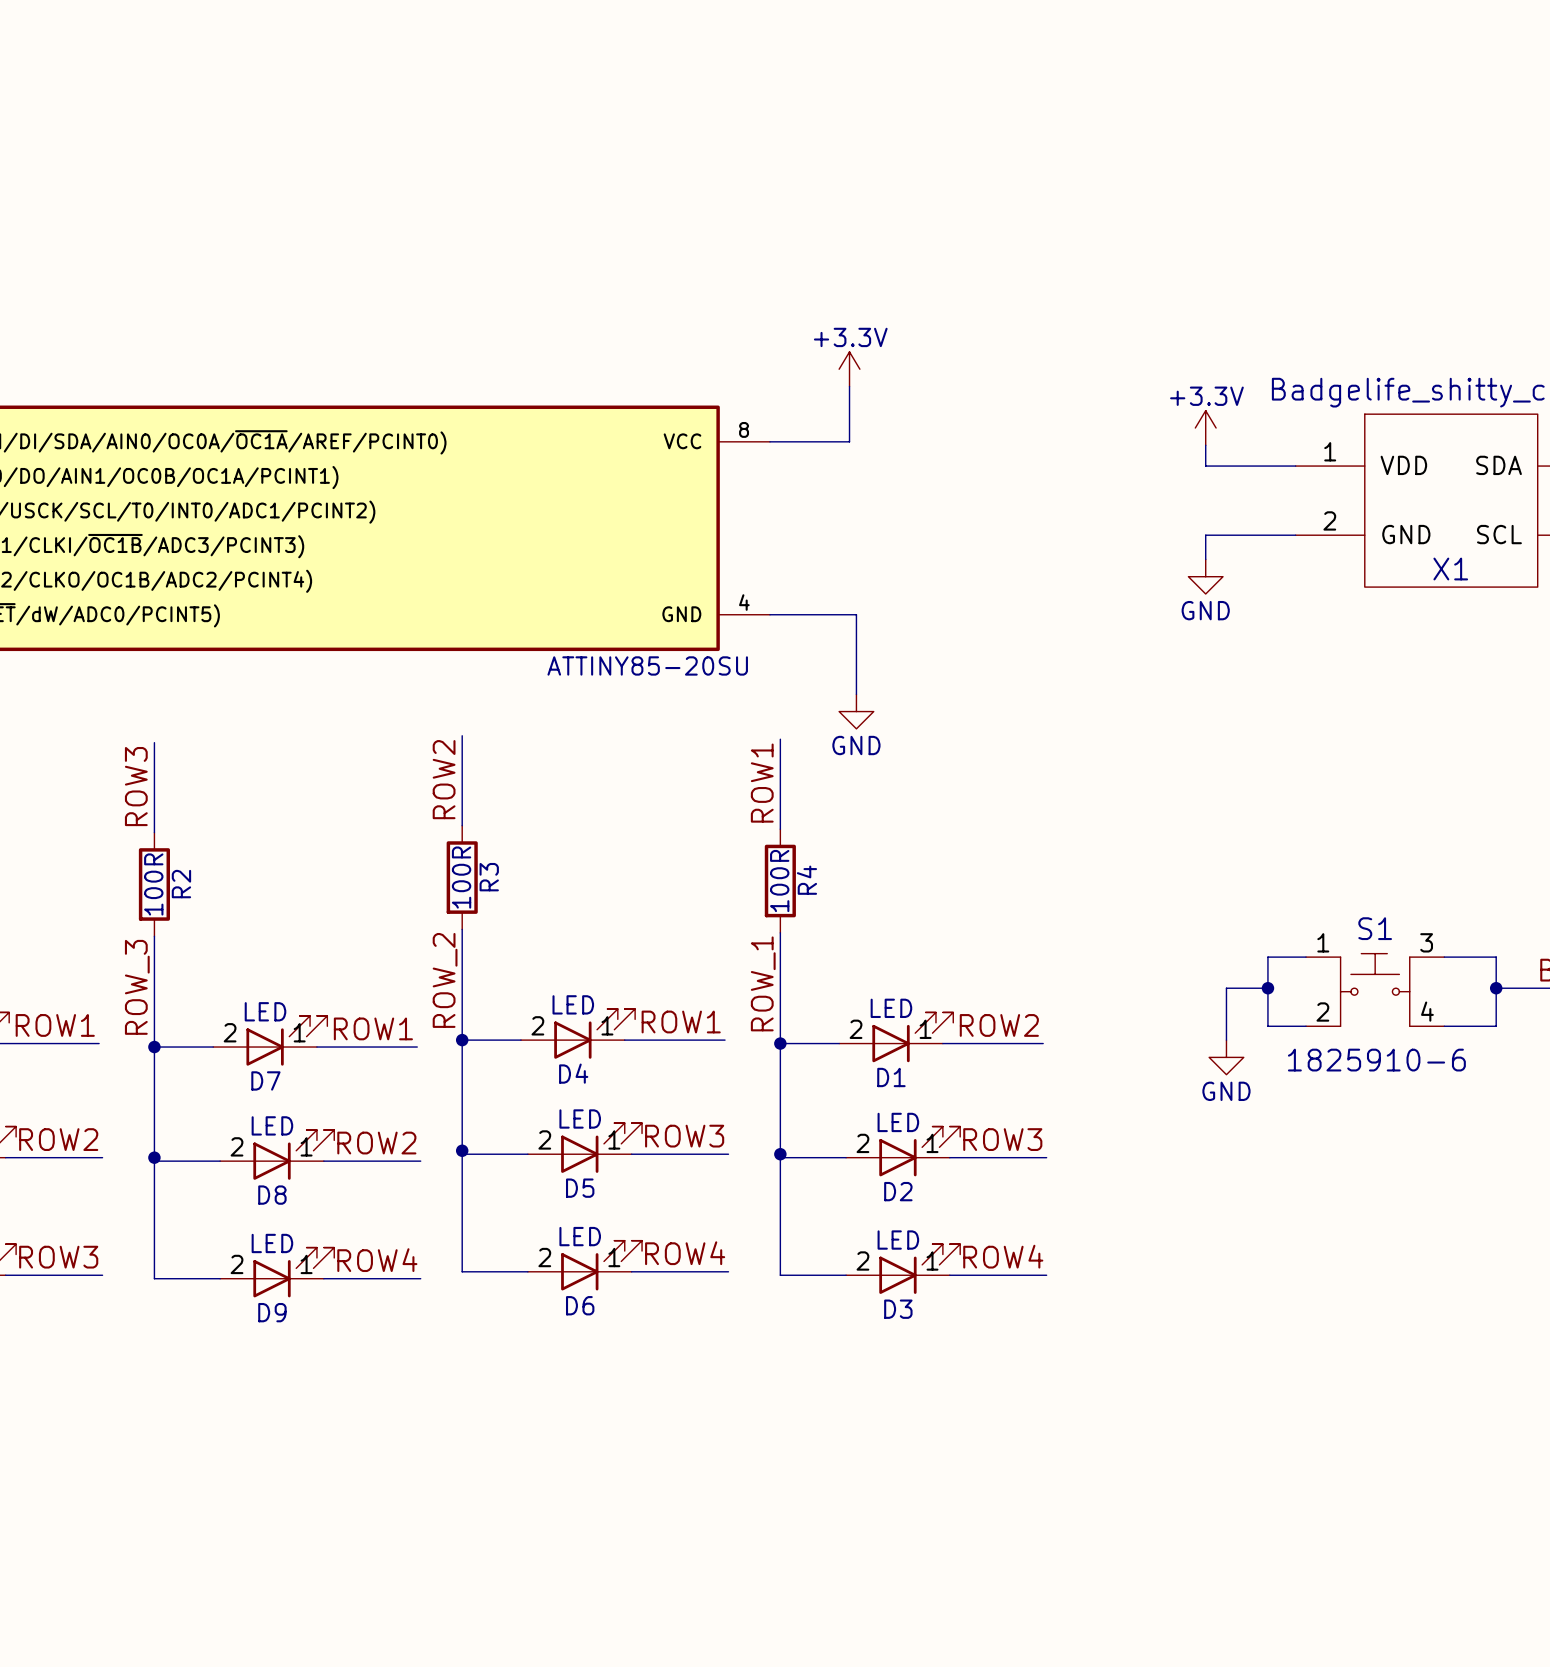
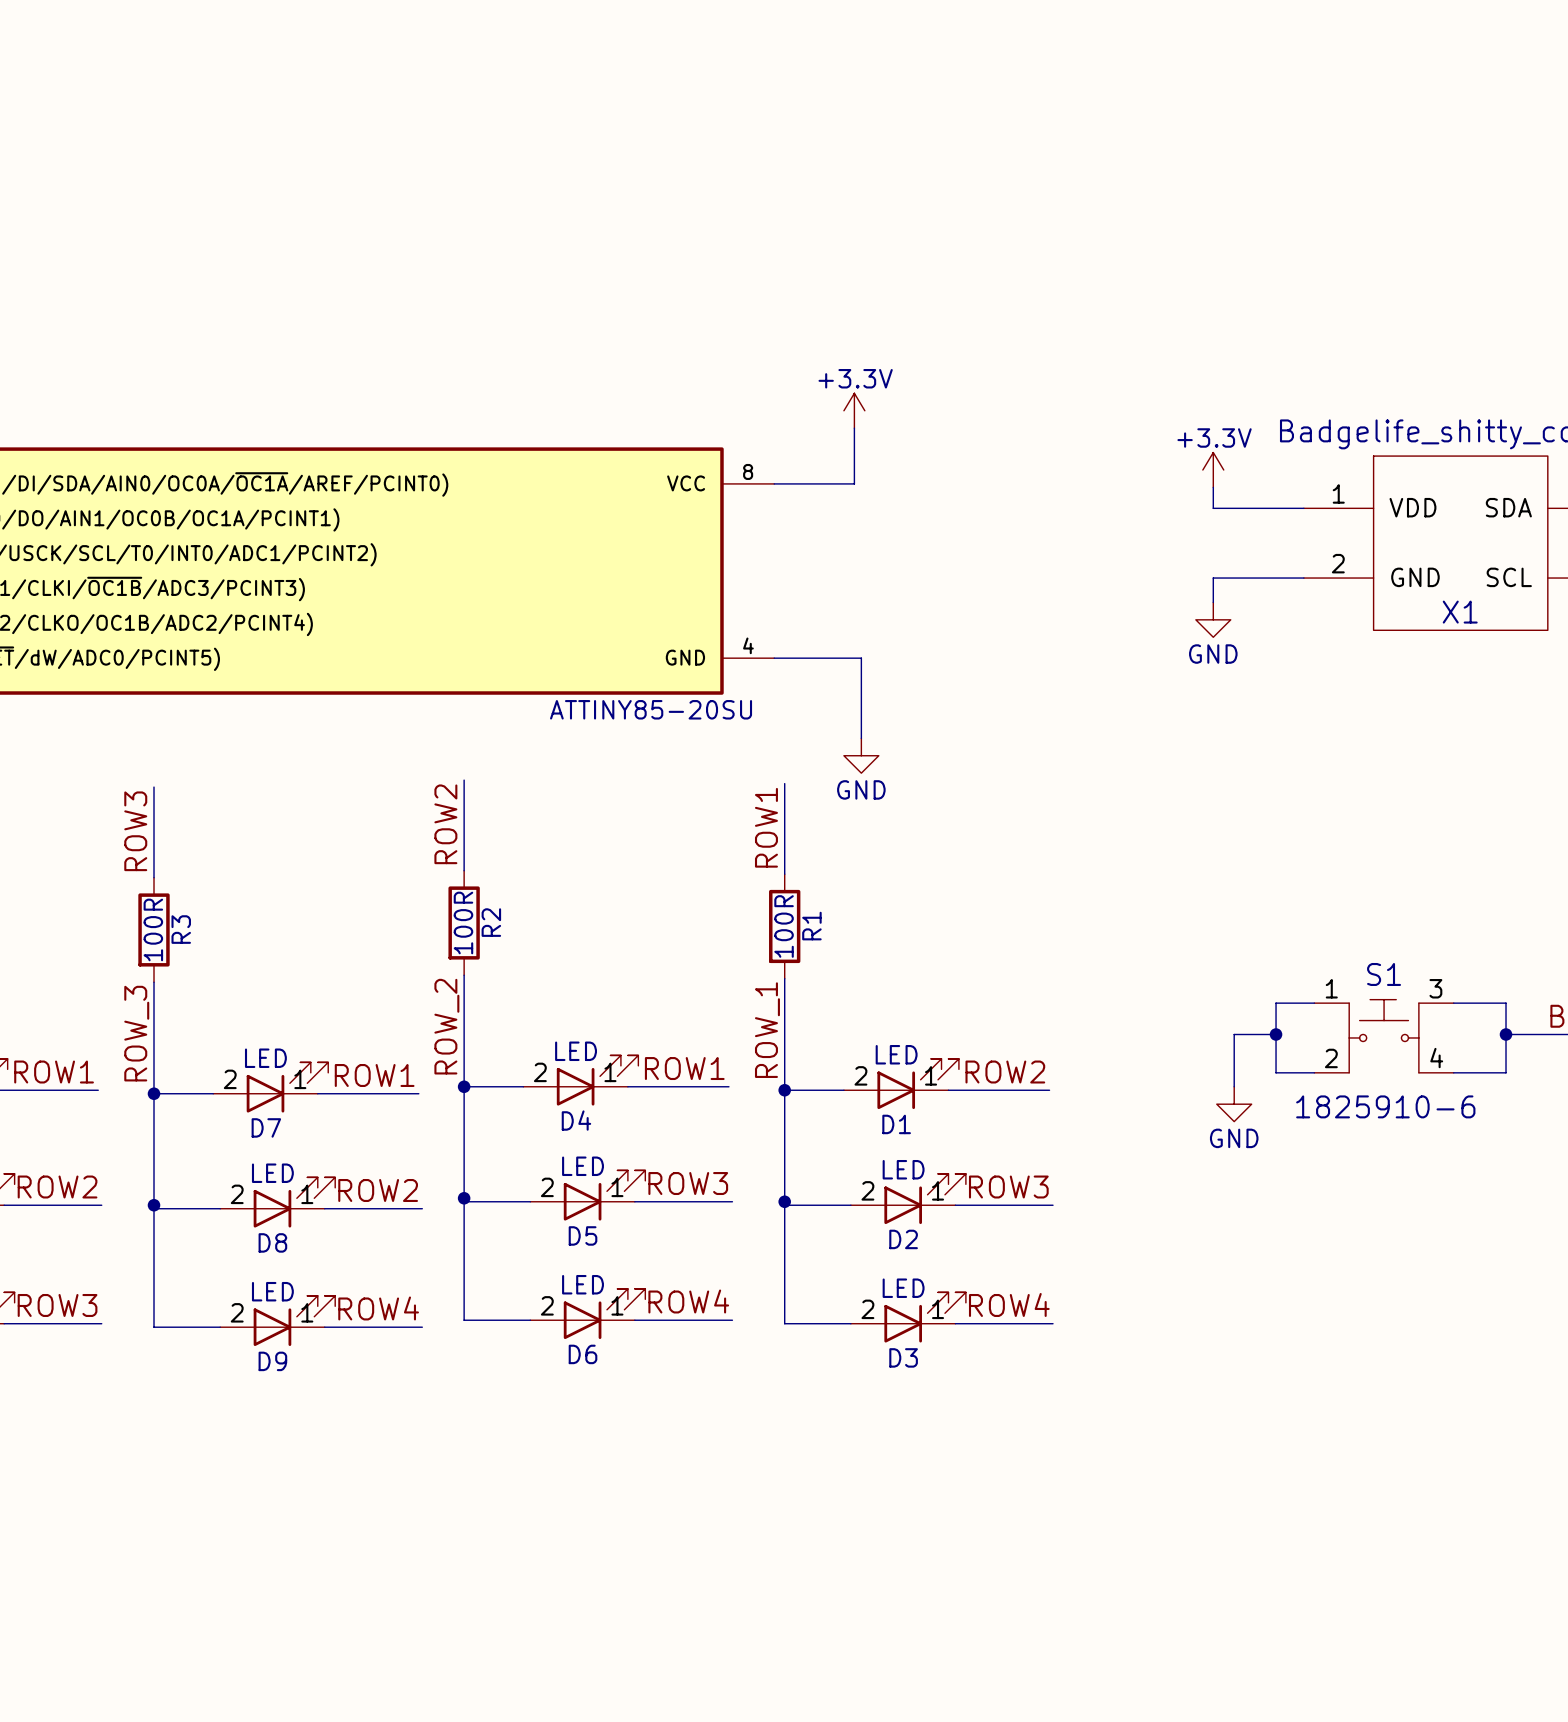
R3 name: R3 (489, 877) -> R2 (491, 922)
R4 name: R4 (806, 880) -> R1 (811, 926)
R2 name: R2 (181, 884) -> R3 (181, 929)

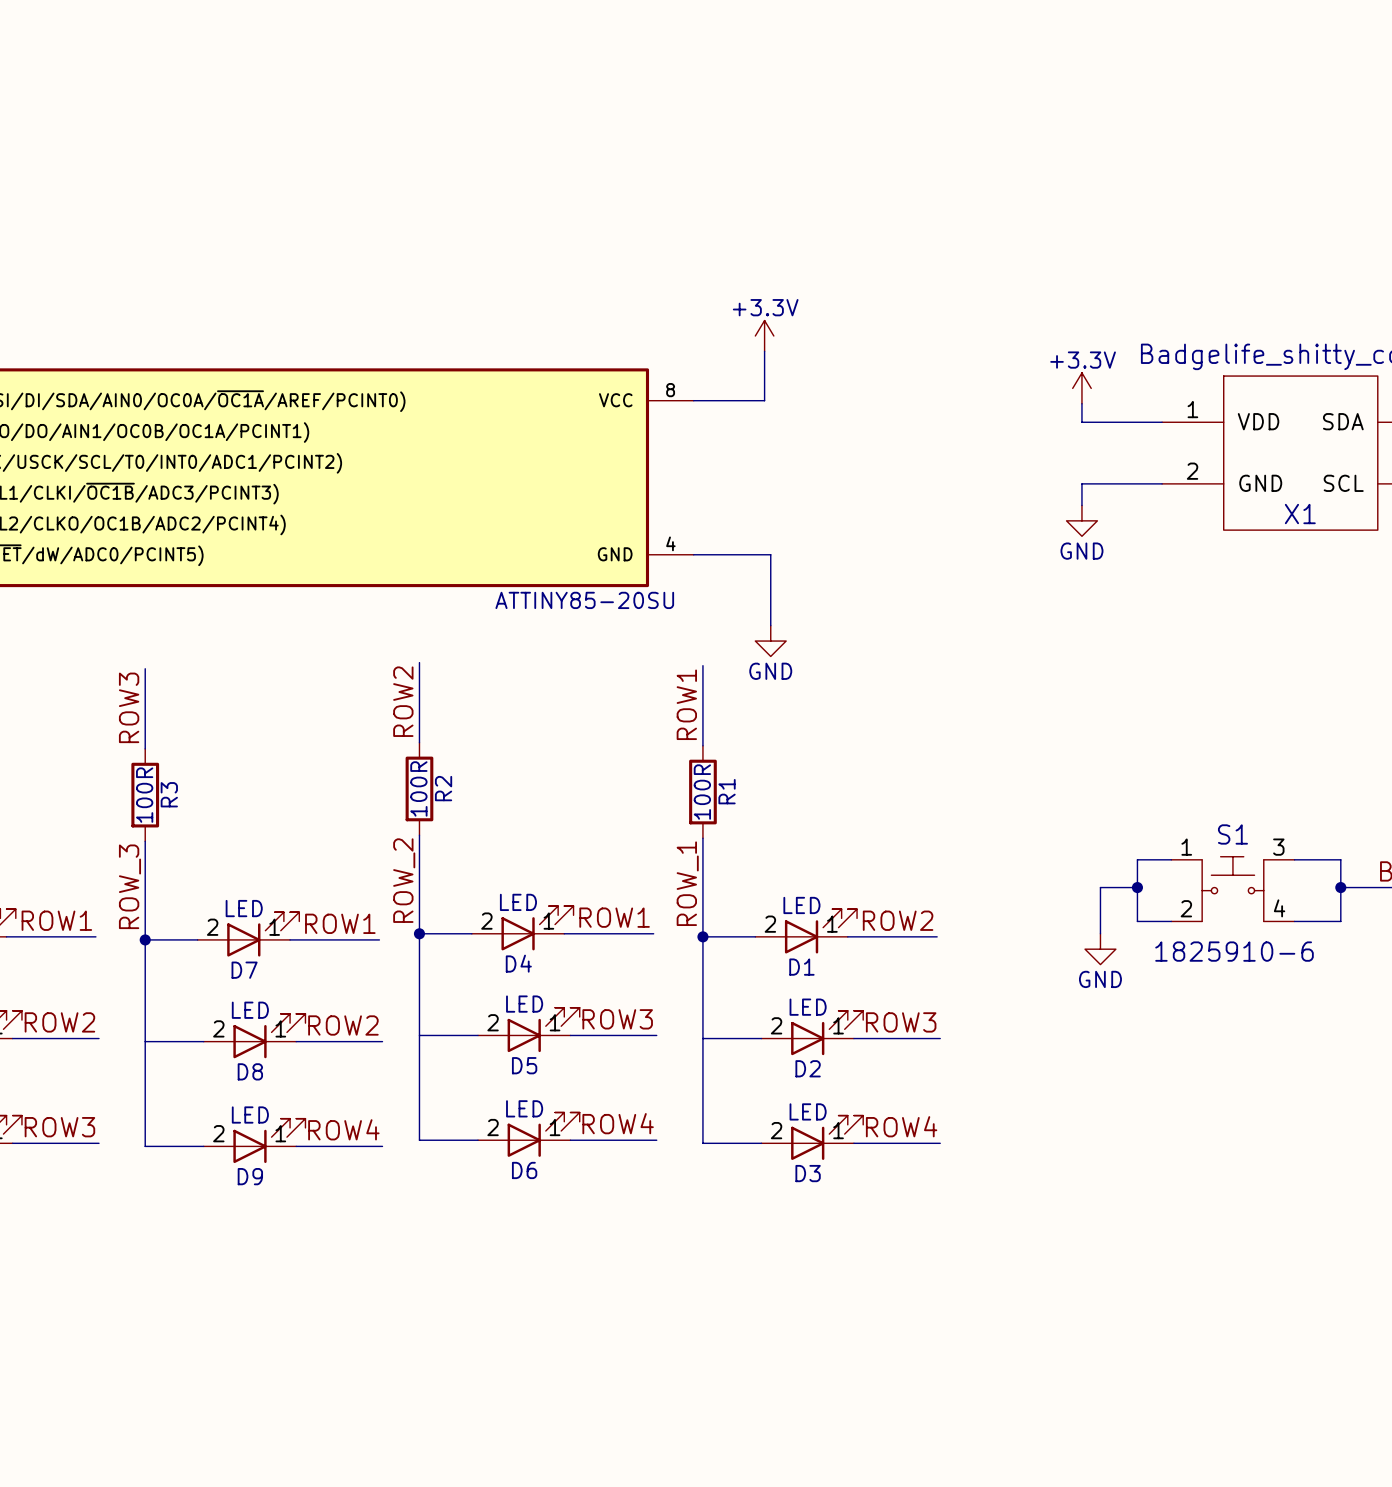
junction: (464, 1198) -> none
junction: (784, 1201) -> none
junction: (154, 1205) -> none

